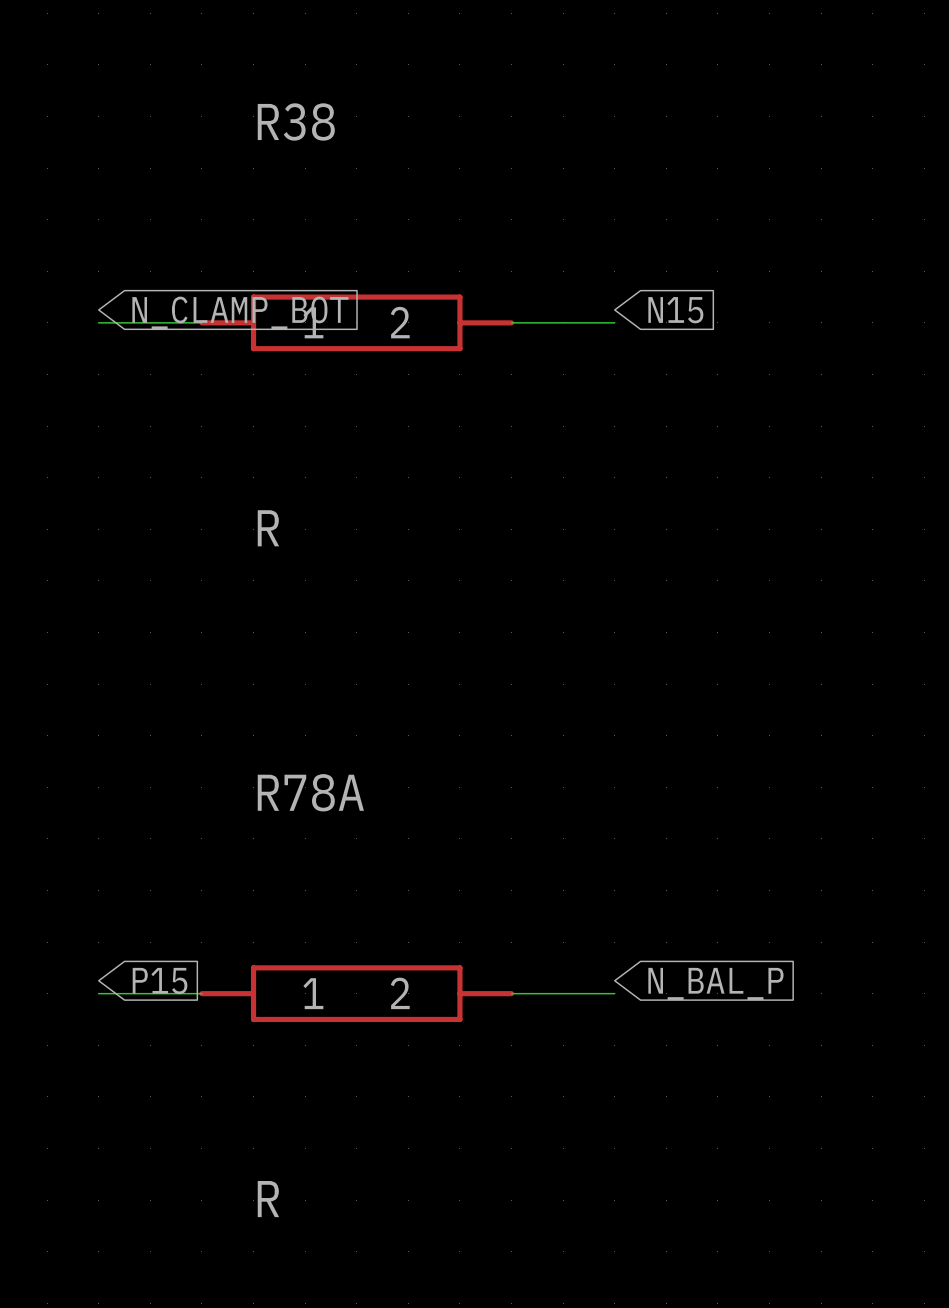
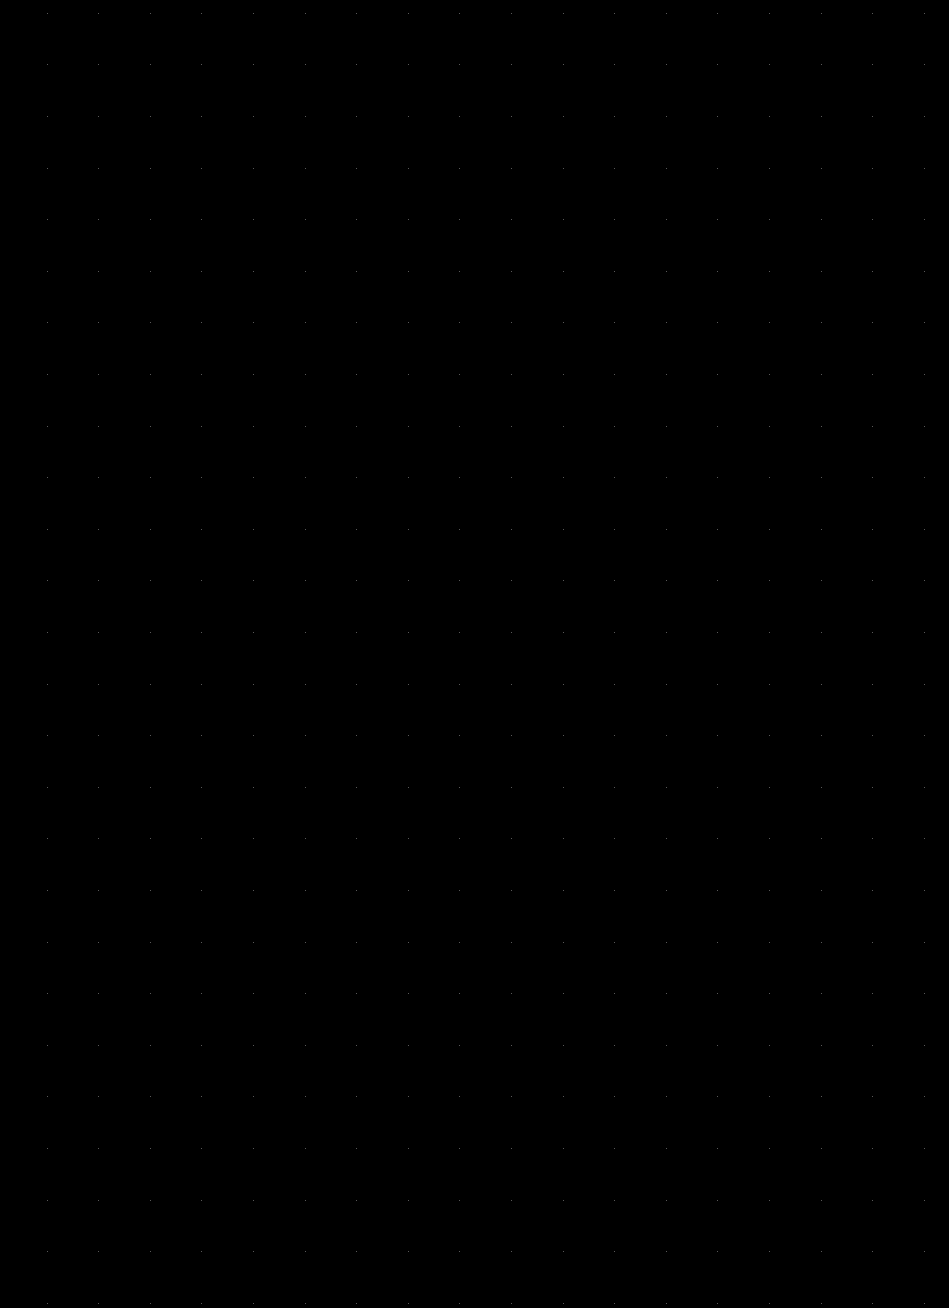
global label: N15 (675, 310) -> none
global label: N_CLAMP_BOT (240, 312) -> none
wire: (98, 322) (201, 322) -> none
R38: R (356, 322) -> none
wire: (511, 322) (614, 322) -> none
global label: P15 (160, 980) -> none
global label: N_BAL_P (715, 983) -> none
wire: (98, 993) (201, 993) -> none
R78A: R (356, 993) -> none
wire: (511, 993) (614, 993) -> none

